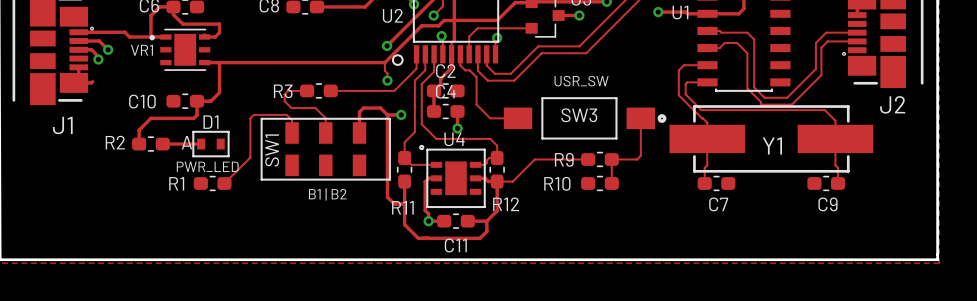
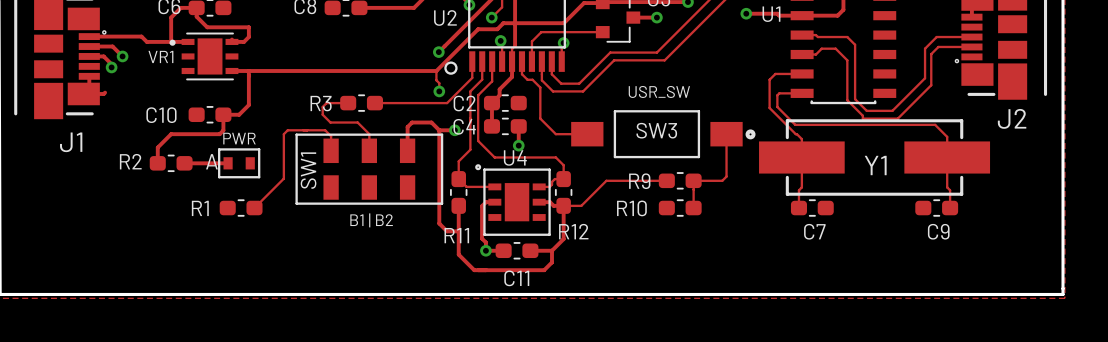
C2 name position: C2 (445, 71) -> C2 (464, 103)
C4 name position: C4 (445, 91) -> C4 (464, 126)
D1 name: D1 (210, 122) -> none
text: none -> PWR (239, 138)
text: PWR_LED (207, 166) -> none

